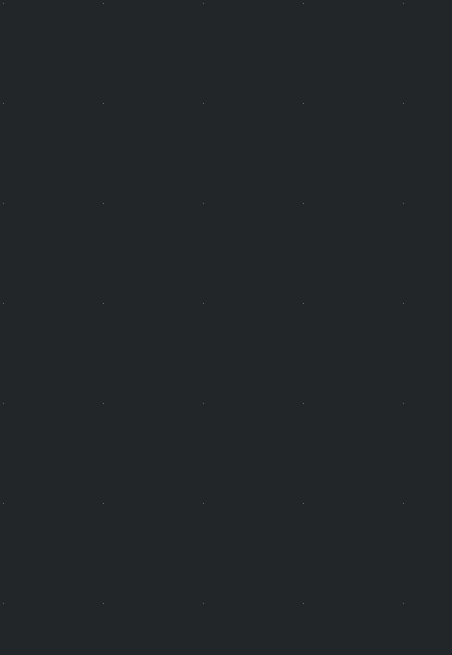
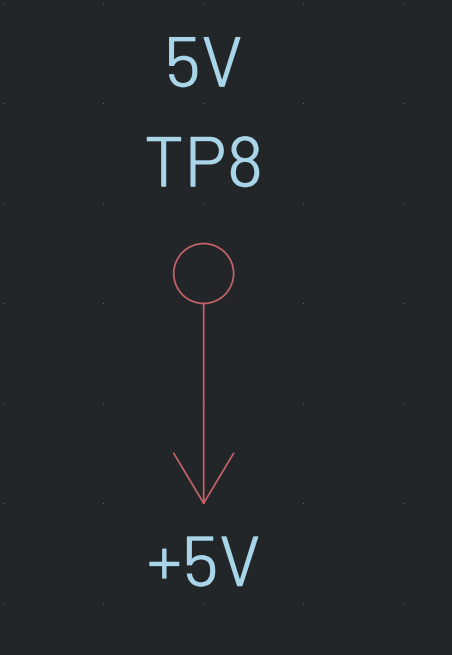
TP8: none -> 5V (203, 323)
power symbol: none -> +5V (203, 453)

